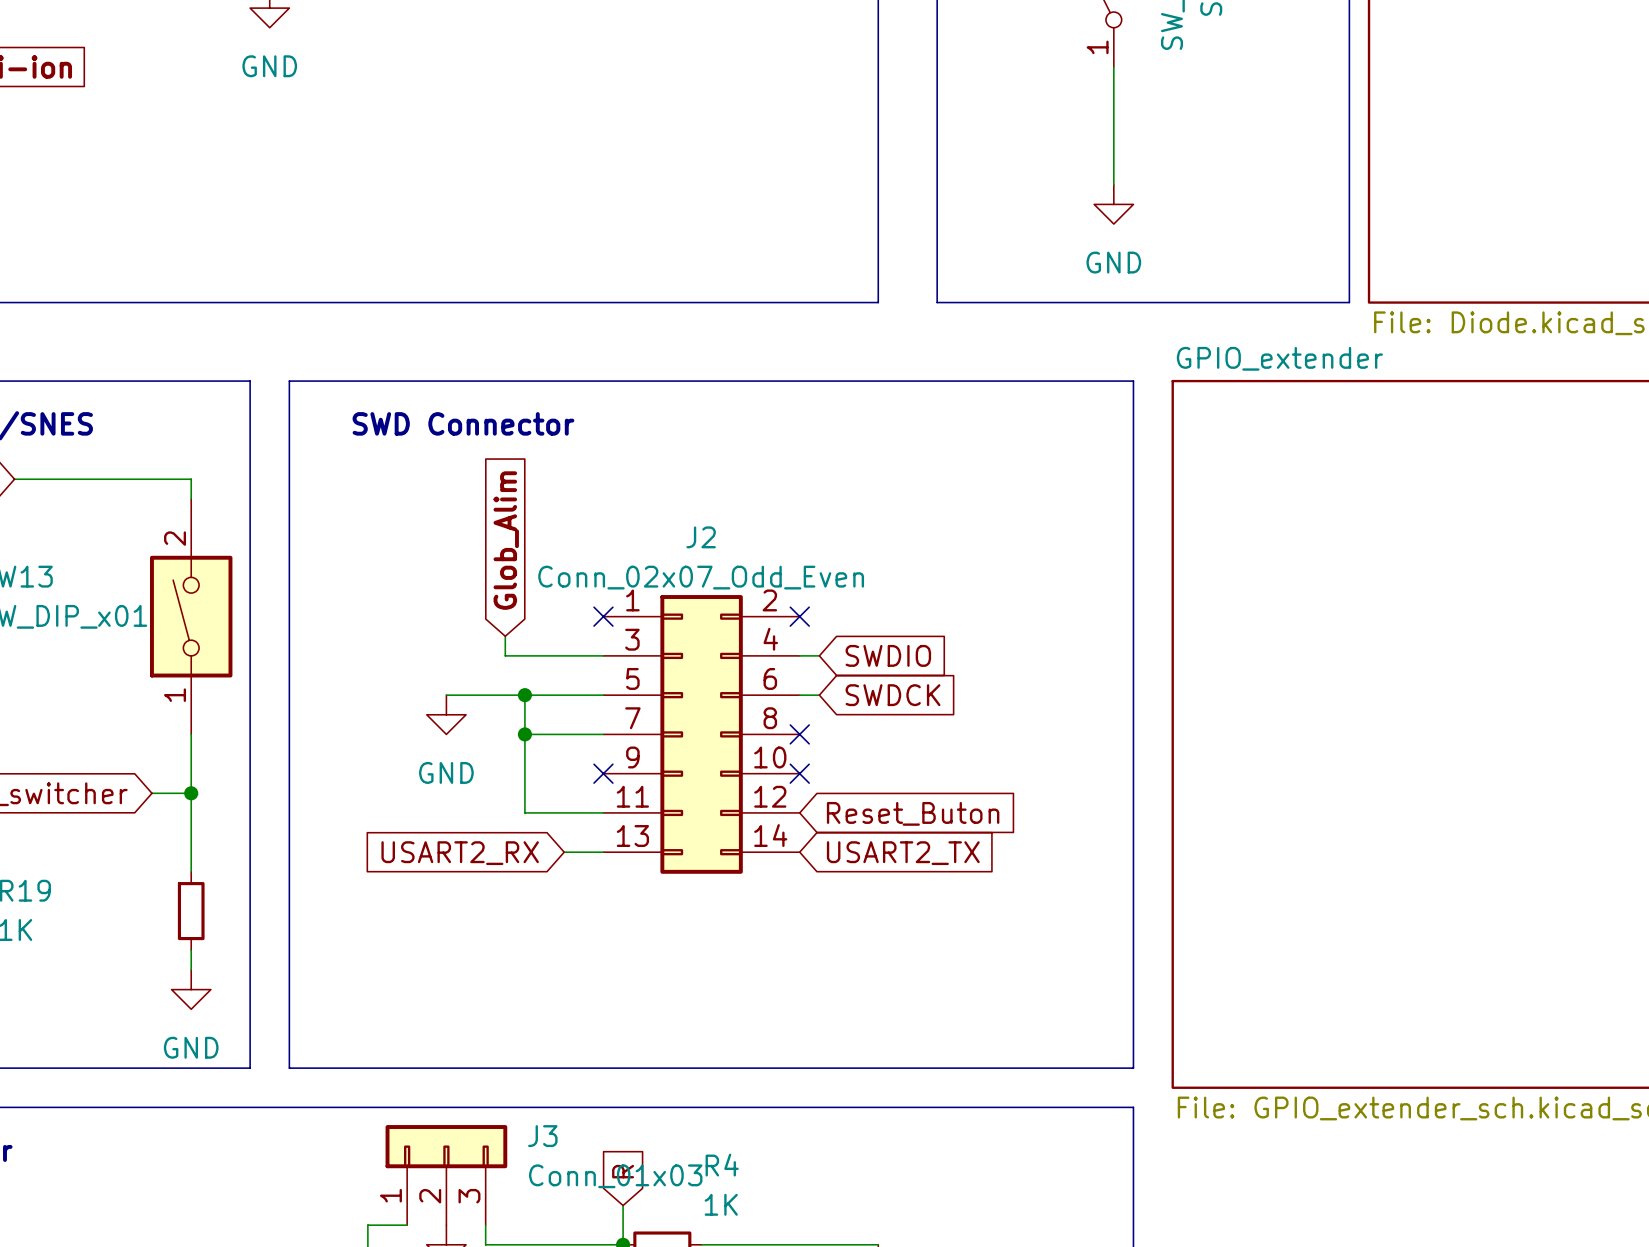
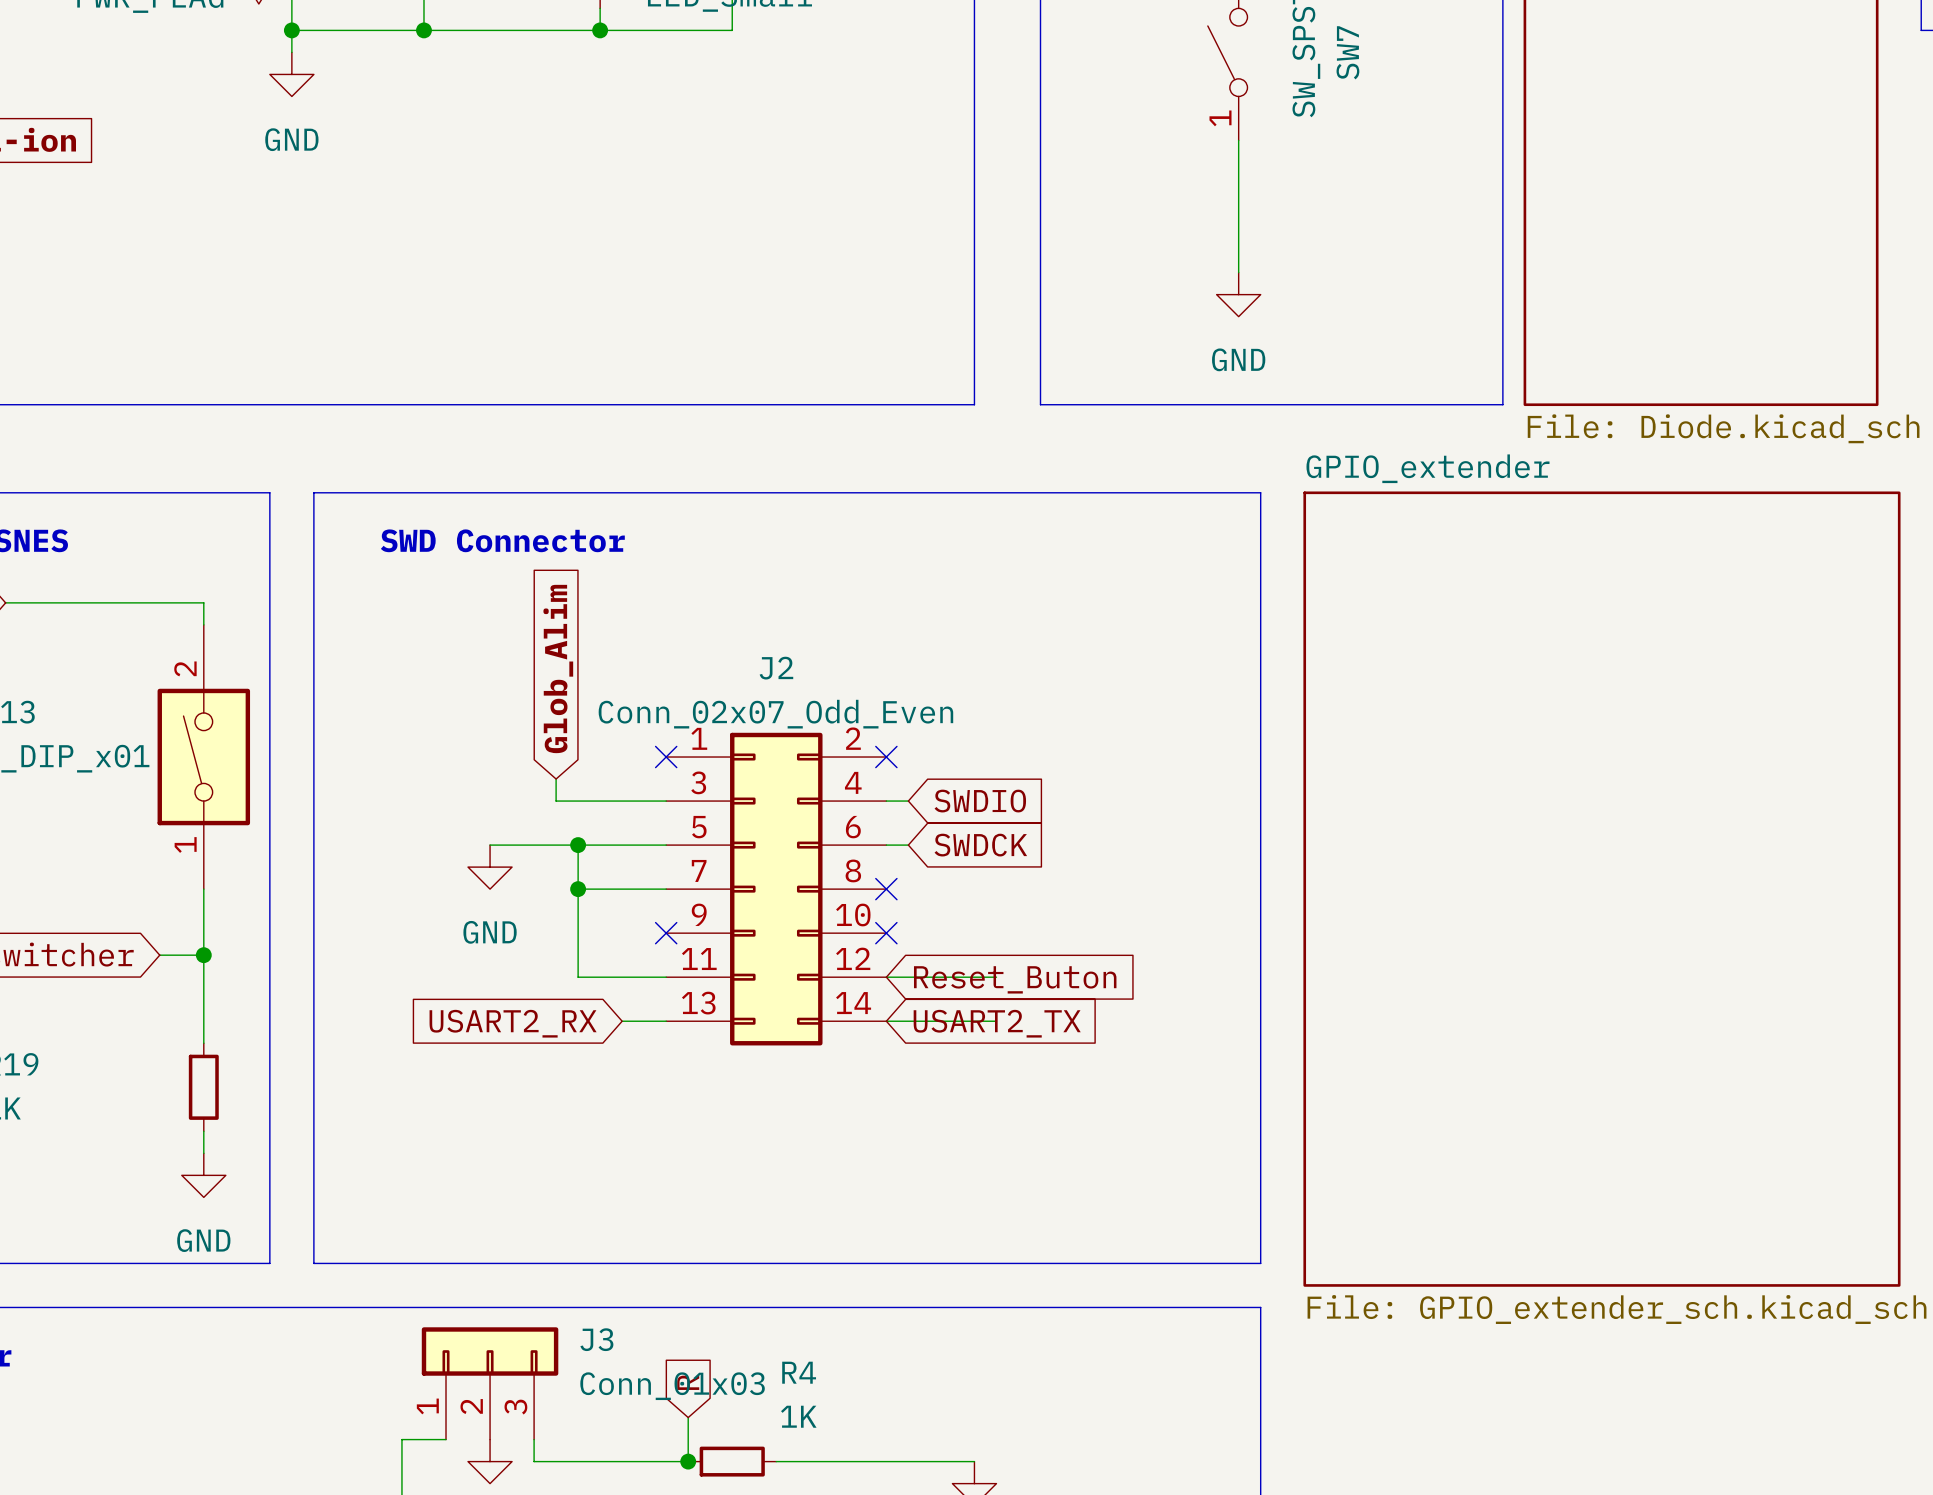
wire: none -> (886, 977) (996, 977)
wire: none -> (886, 1021) (996, 1021)

